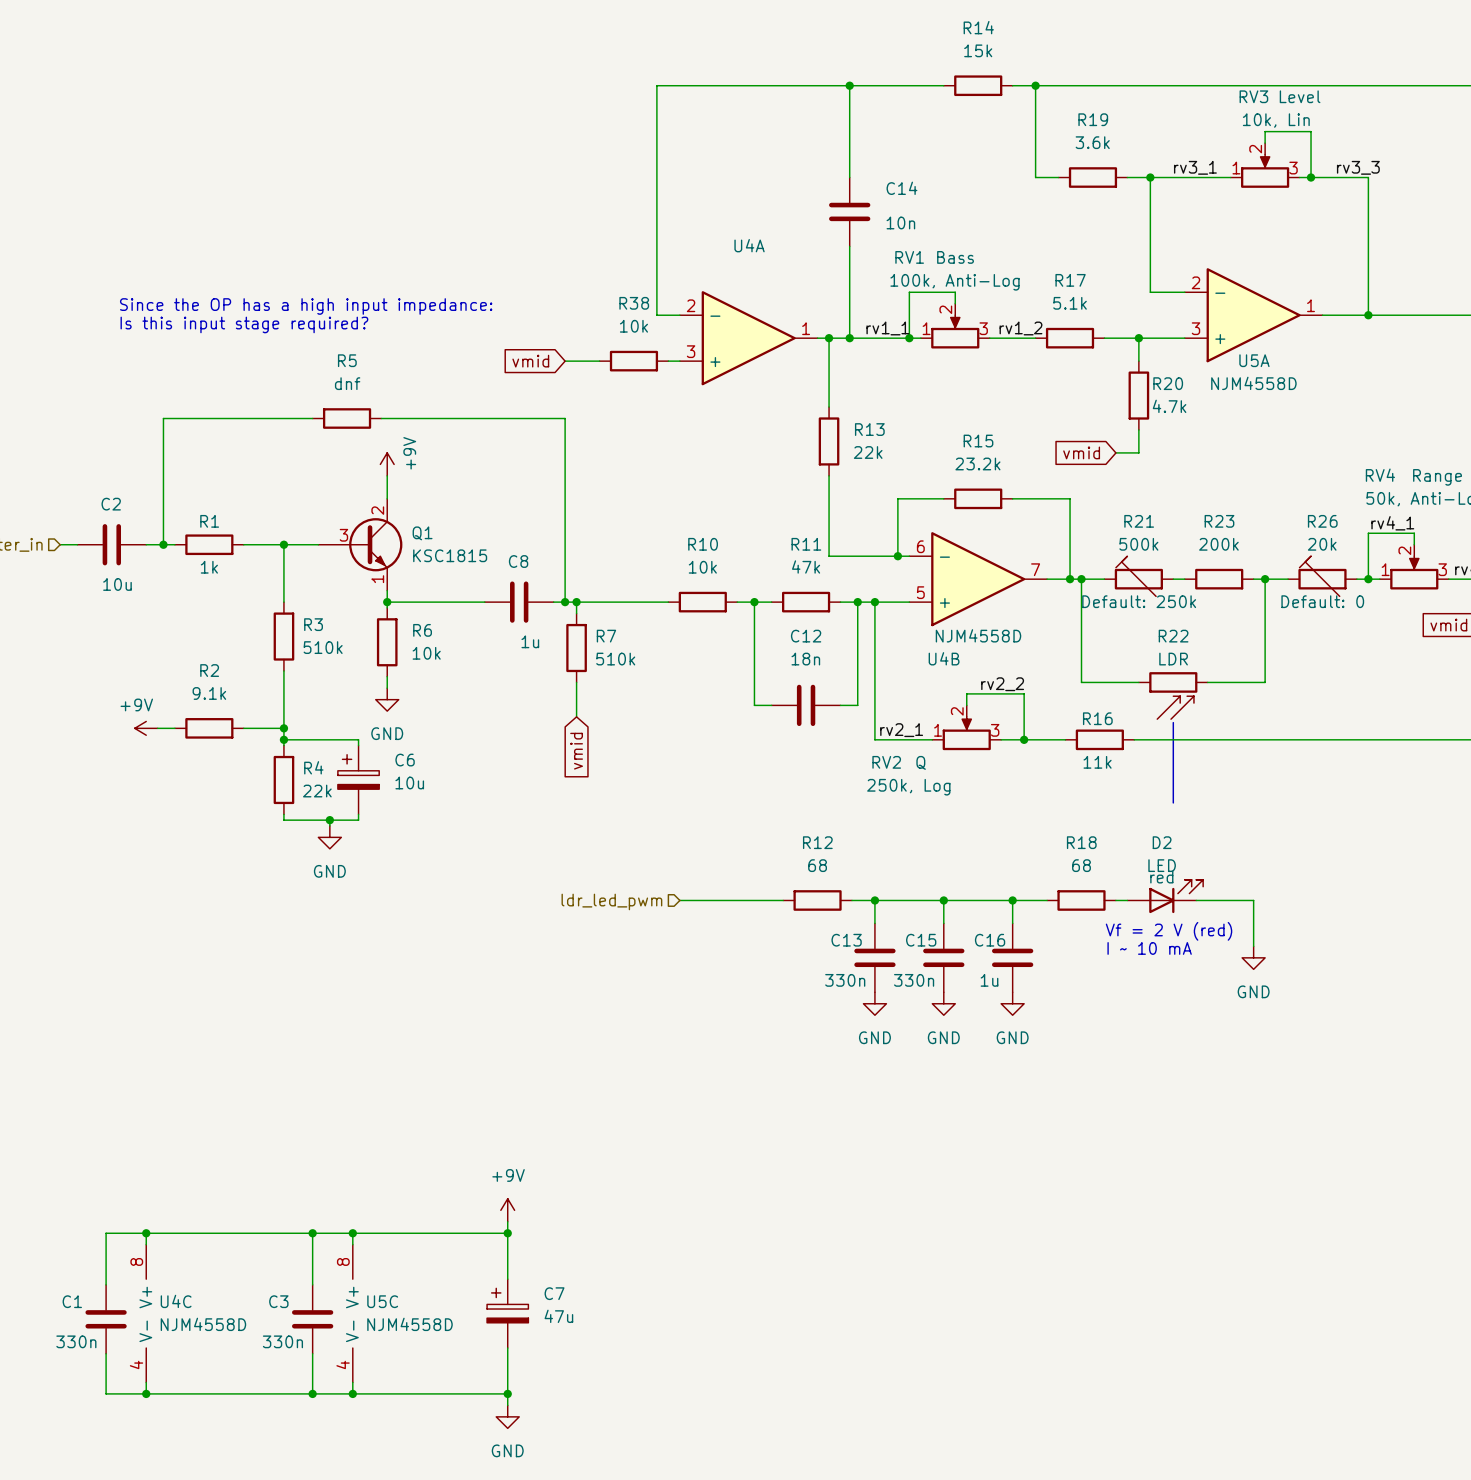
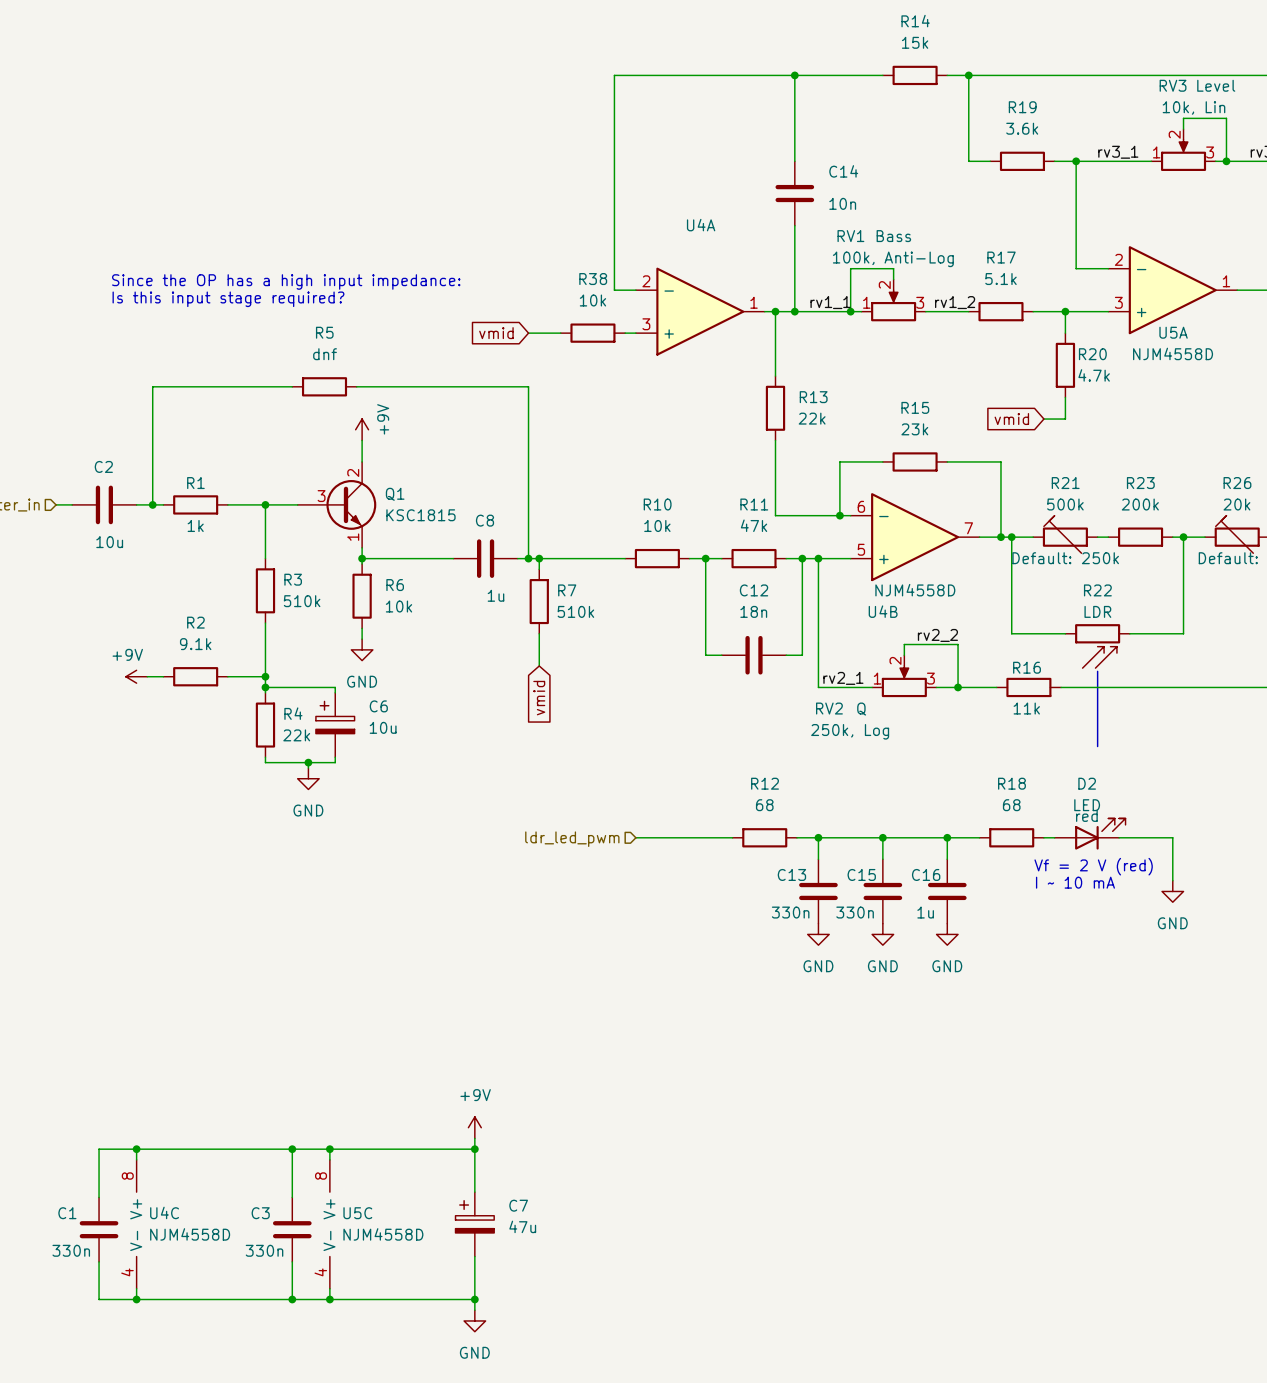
R15 value: 23.2k (977, 463) -> 23k (914, 429)

